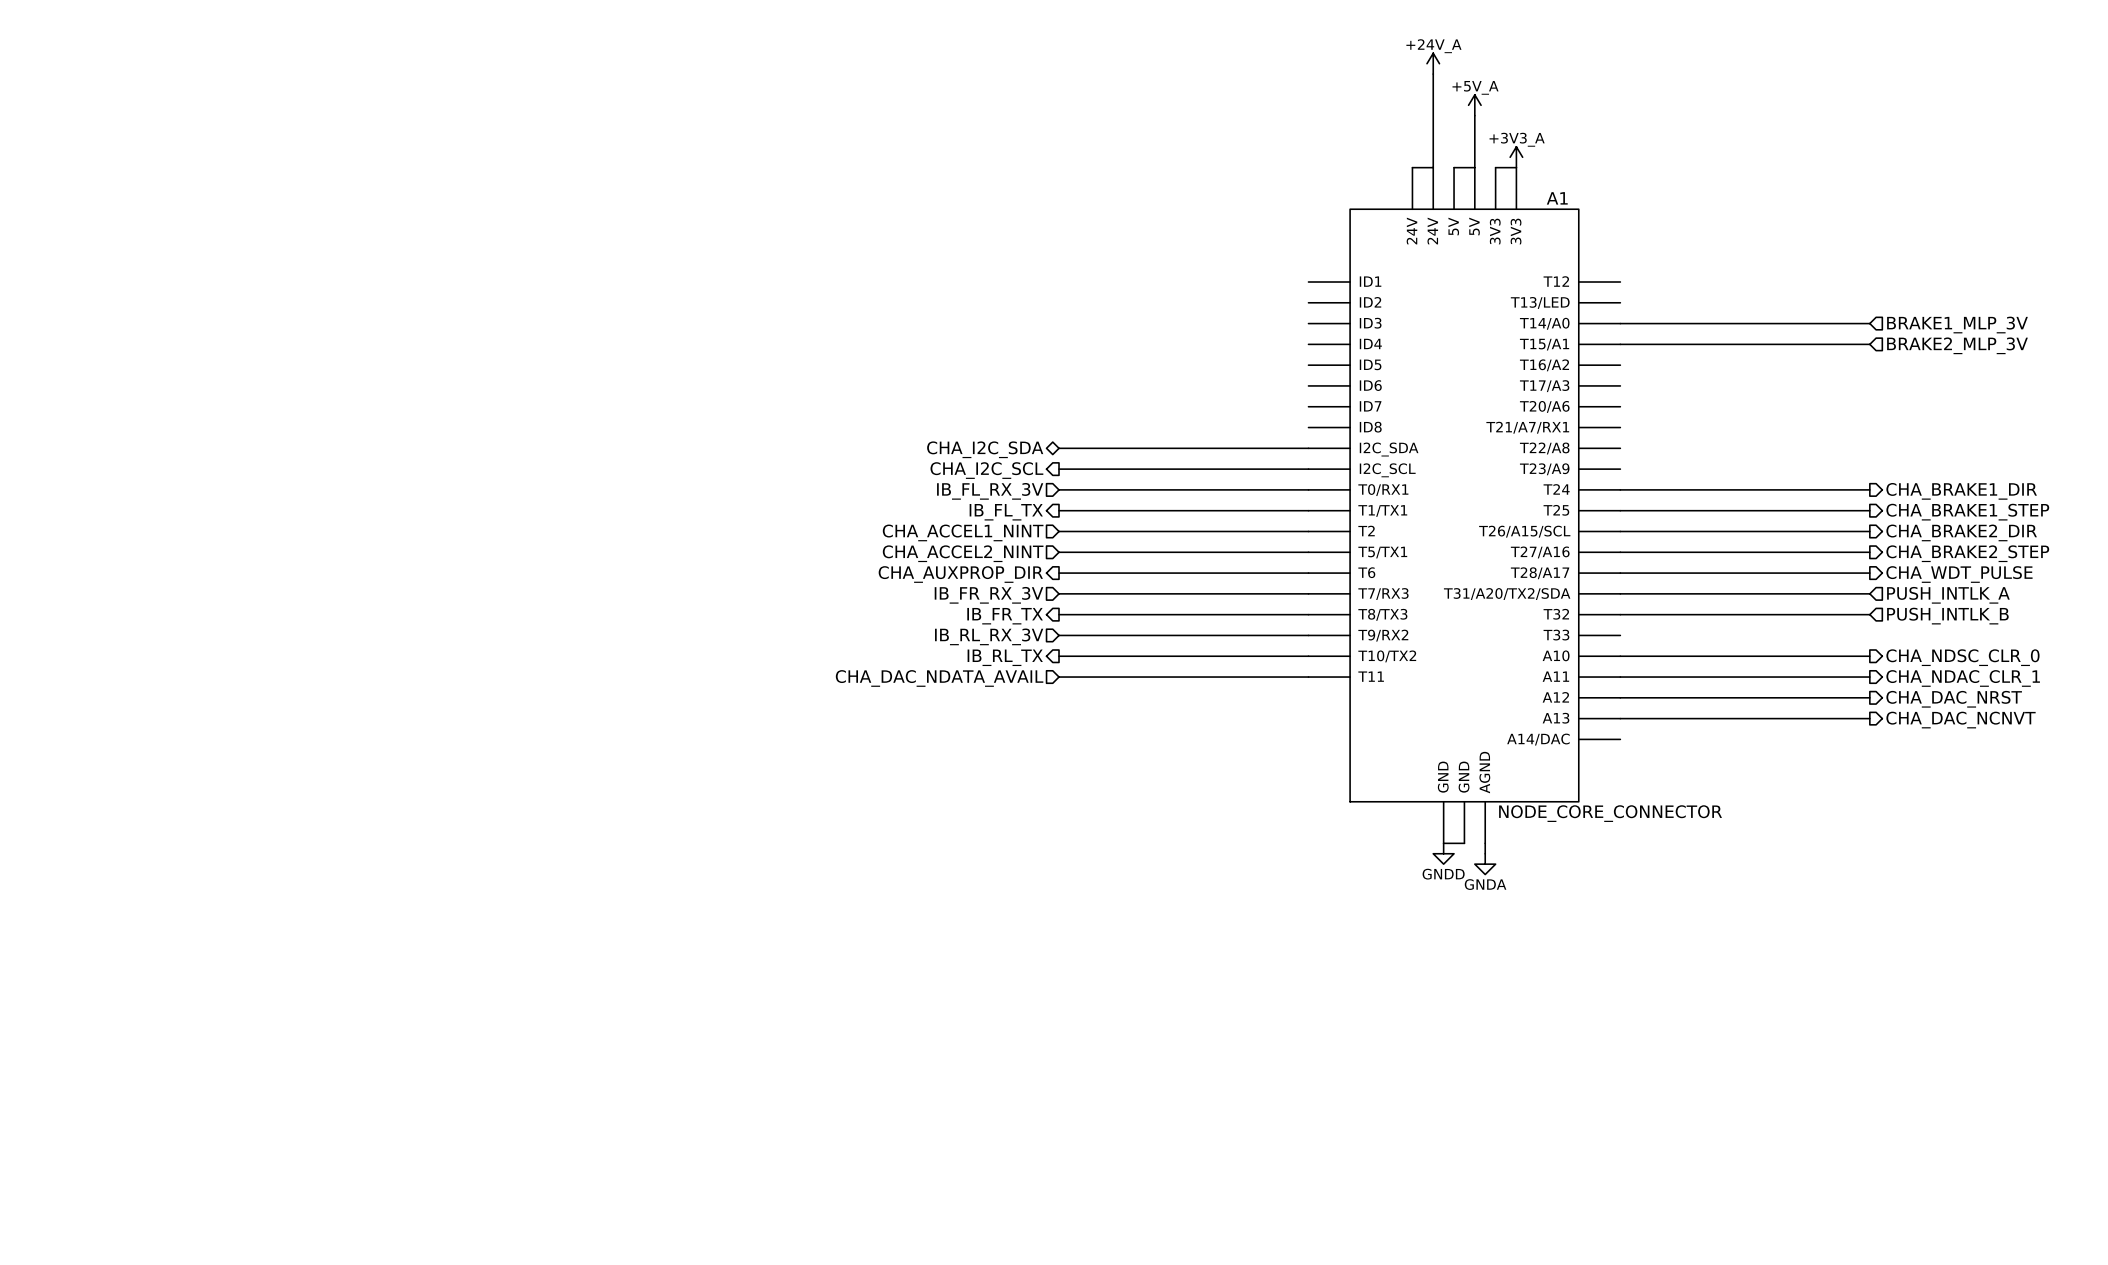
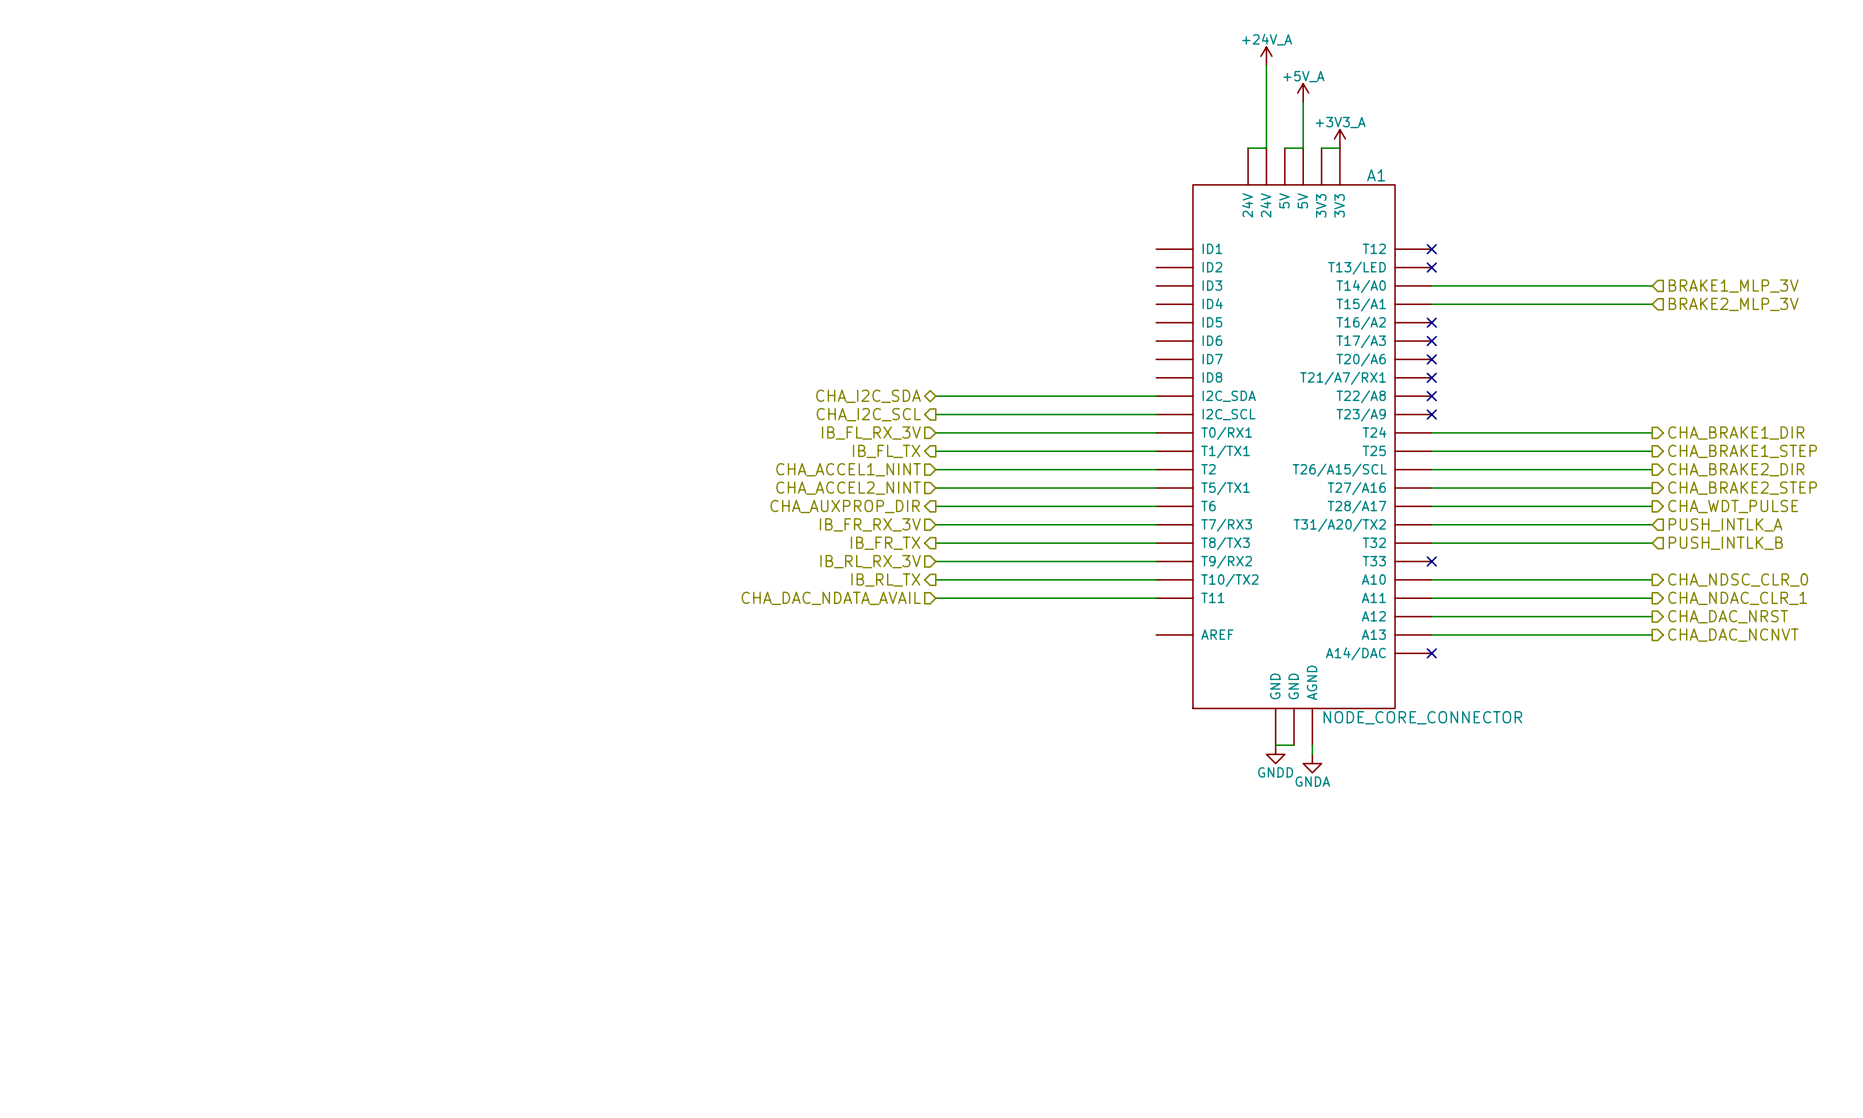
A1 symbol: [1308, 167, 1621, 844] -> [1156, 148, 1432, 746]
no-connect mark: none -> (1431, 249)
no-connect mark: none -> (1431, 267)
no-connect mark: none -> (1431, 322)
no-connect mark: none -> (1431, 341)
no-connect mark: none -> (1431, 359)
no-connect mark: none -> (1431, 377)
no-connect mark: none -> (1431, 396)
no-connect mark: none -> (1431, 414)
no-connect mark: none -> (1431, 561)
no-connect mark: none -> (1431, 653)

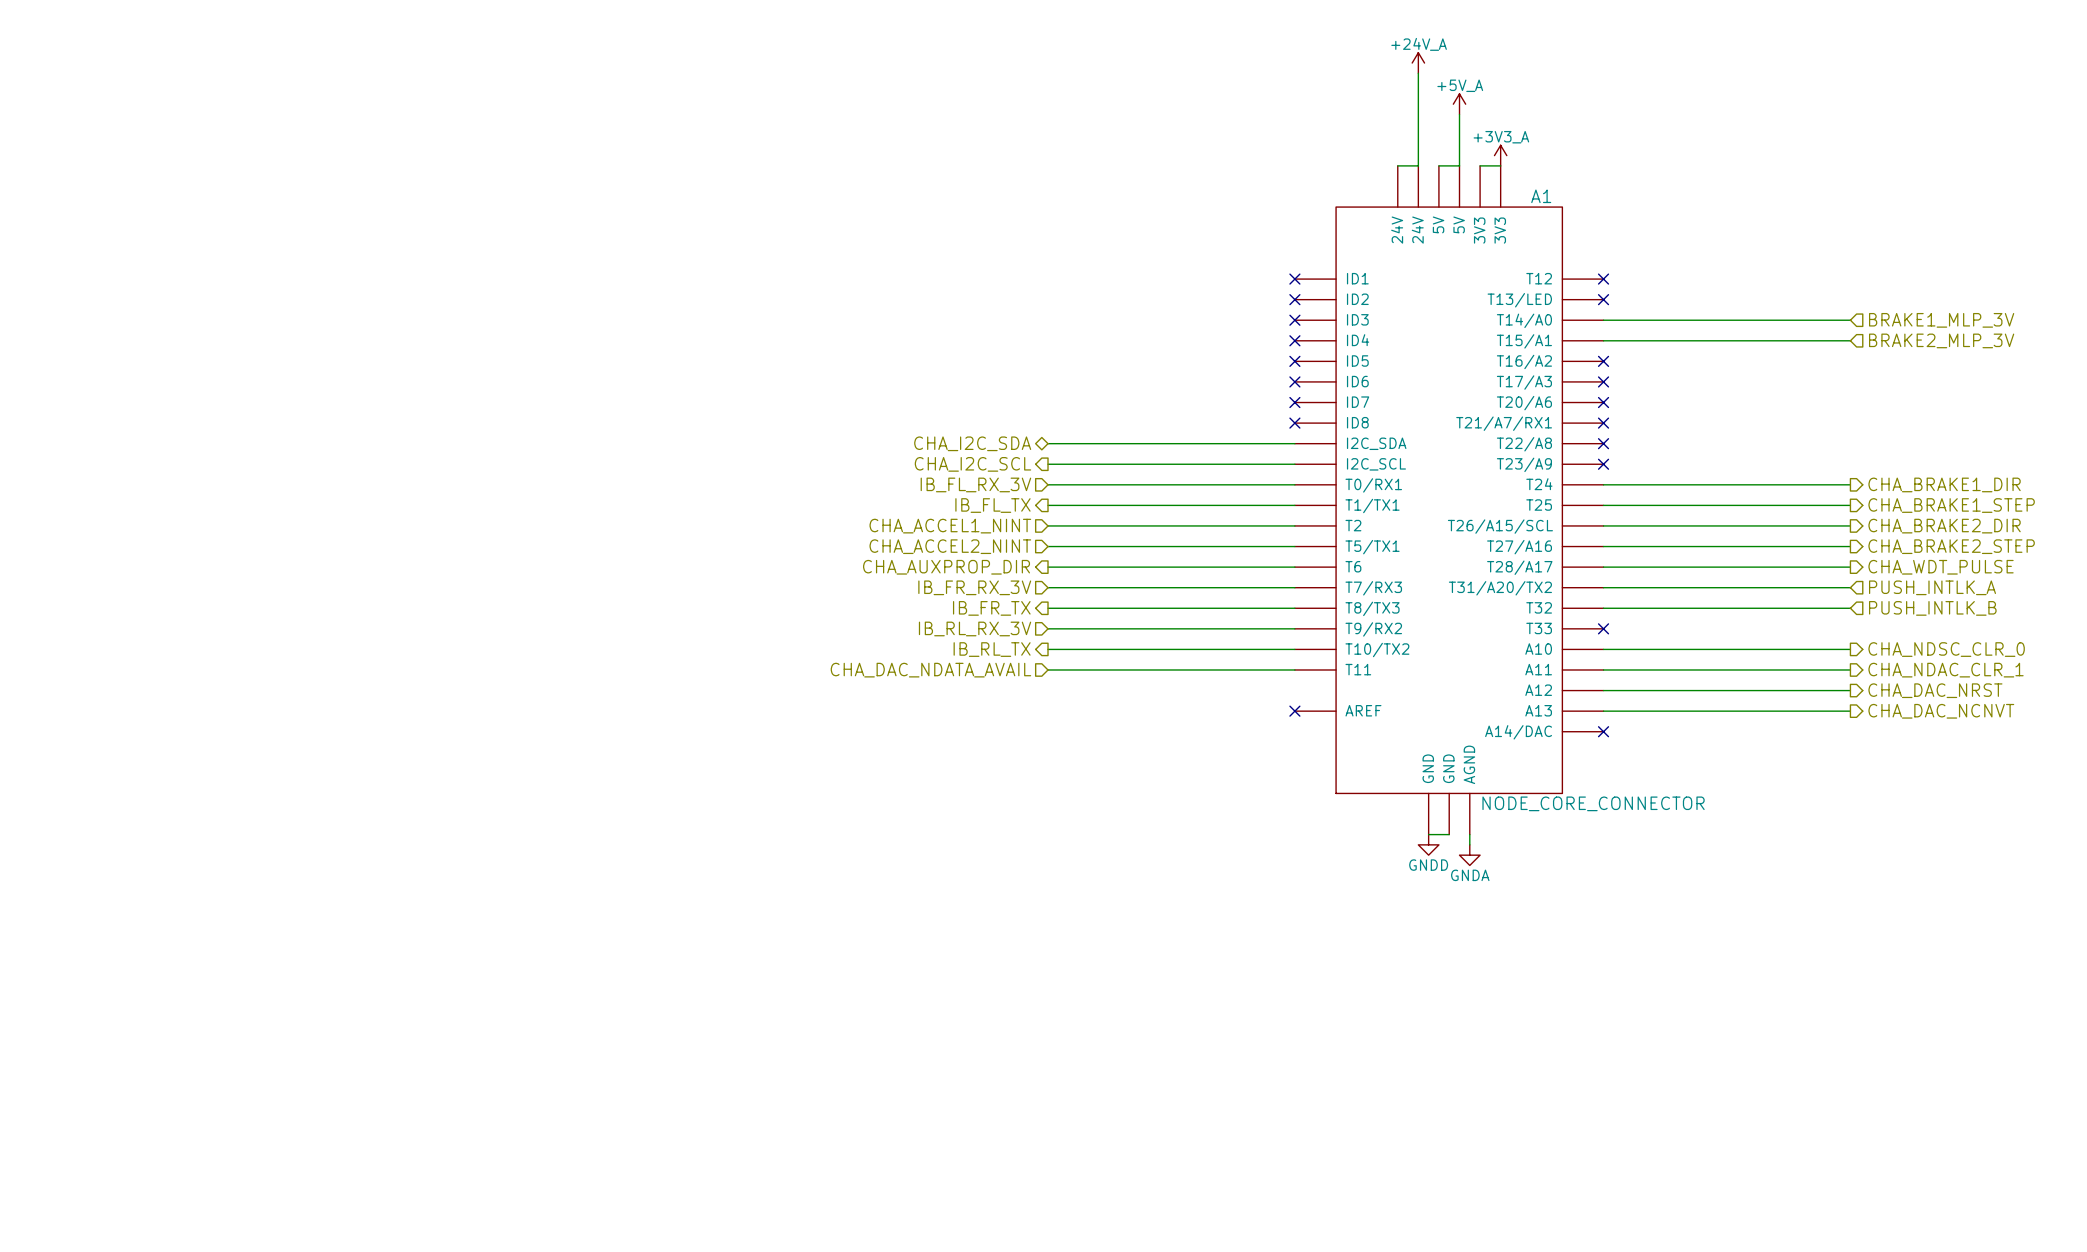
no-connect mark: none -> (1294, 279)
no-connect mark: none -> (1294, 299)
no-connect mark: none -> (1294, 320)
no-connect mark: none -> (1294, 340)
no-connect mark: none -> (1294, 361)
no-connect mark: none -> (1294, 381)
no-connect mark: none -> (1294, 402)
no-connect mark: none -> (1294, 423)
no-connect mark: none -> (1294, 711)

